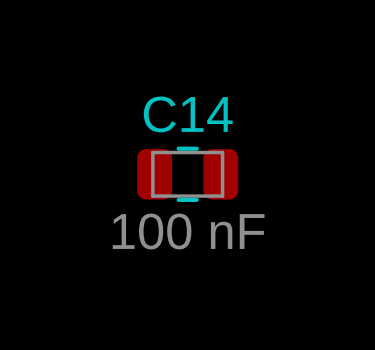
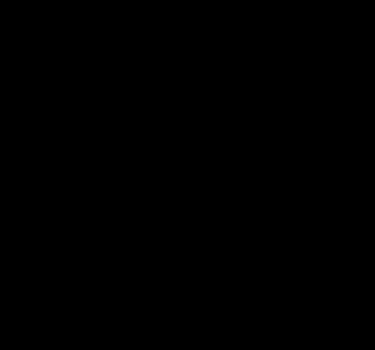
C14: 100 nF (187, 174) -> none

